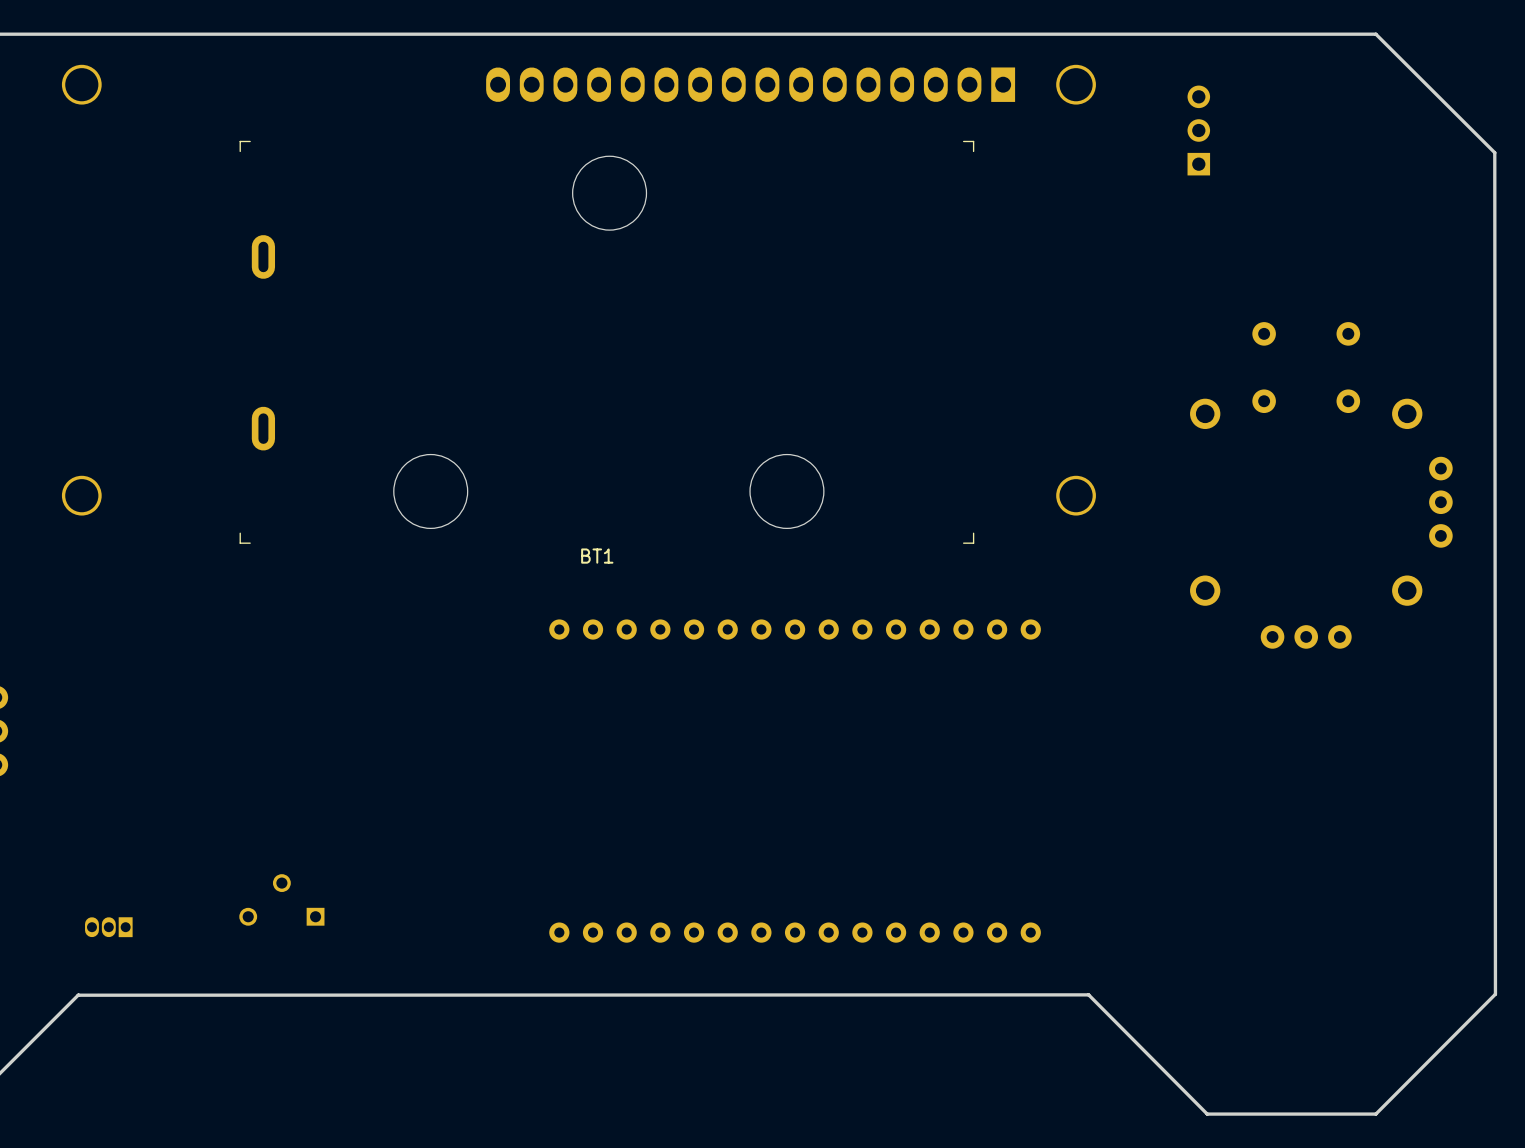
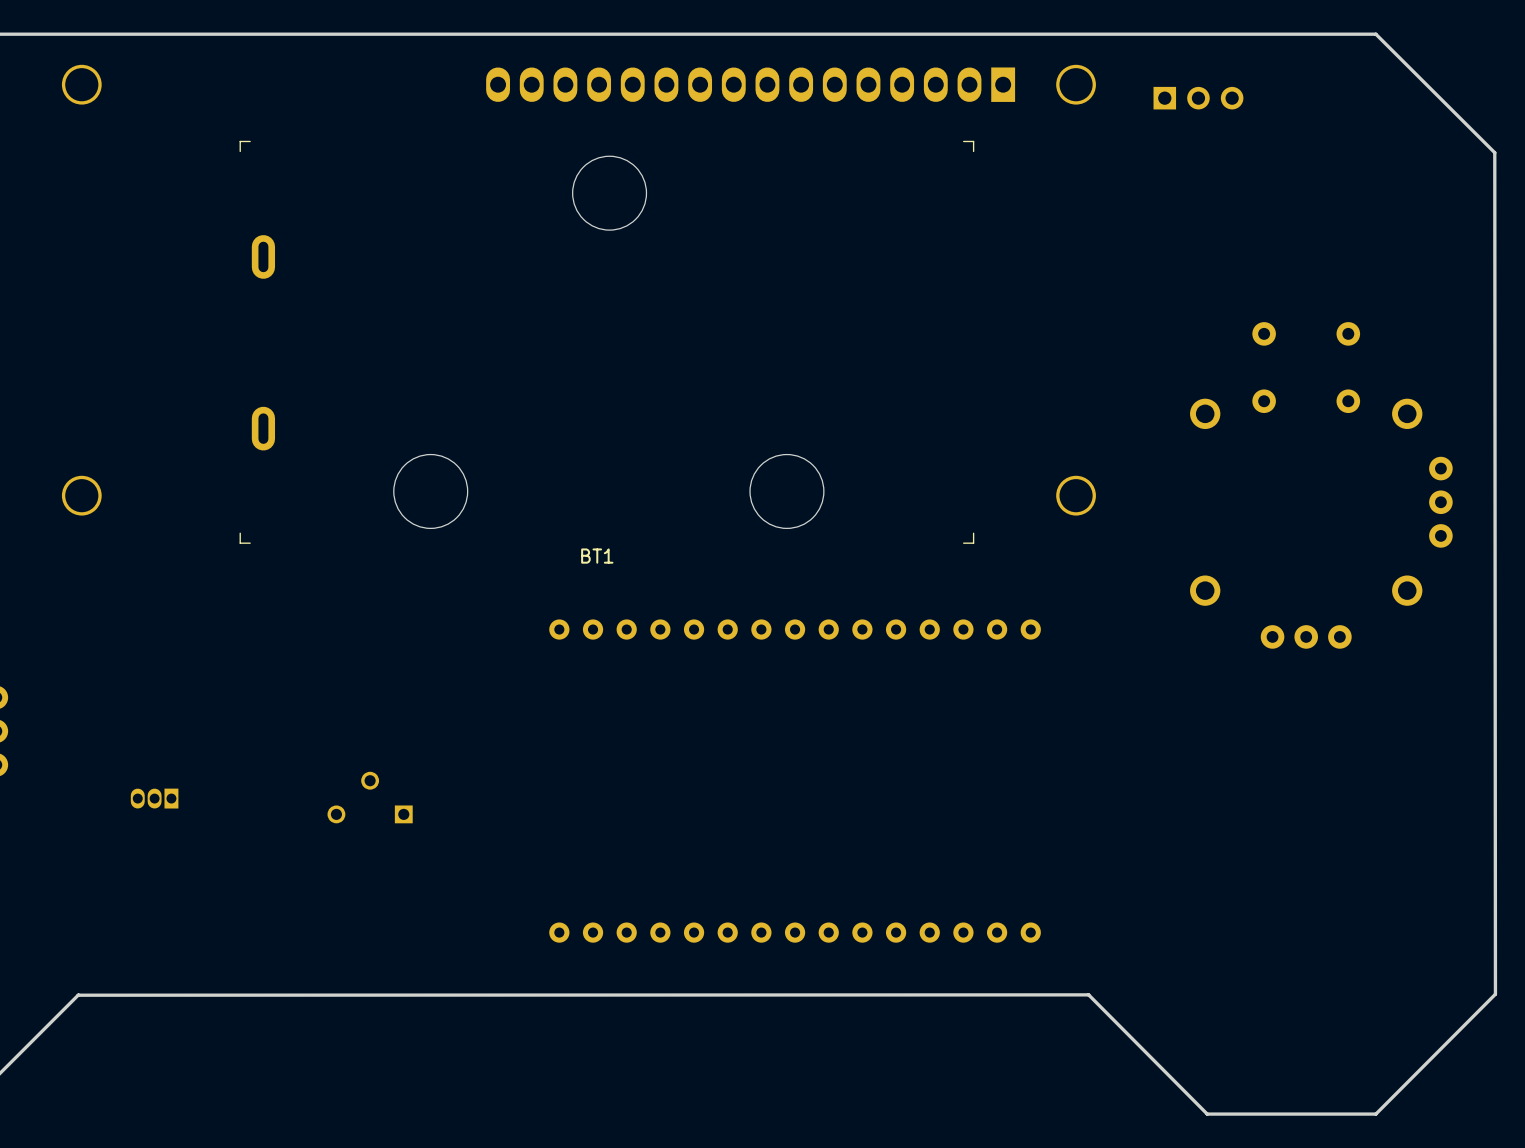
part rotation: 0° (1198, 130) -> 90° clockwise (1198, 98)
part position: (281, 899) -> (370, 797)
part position: (108, 927) -> (154, 798)

